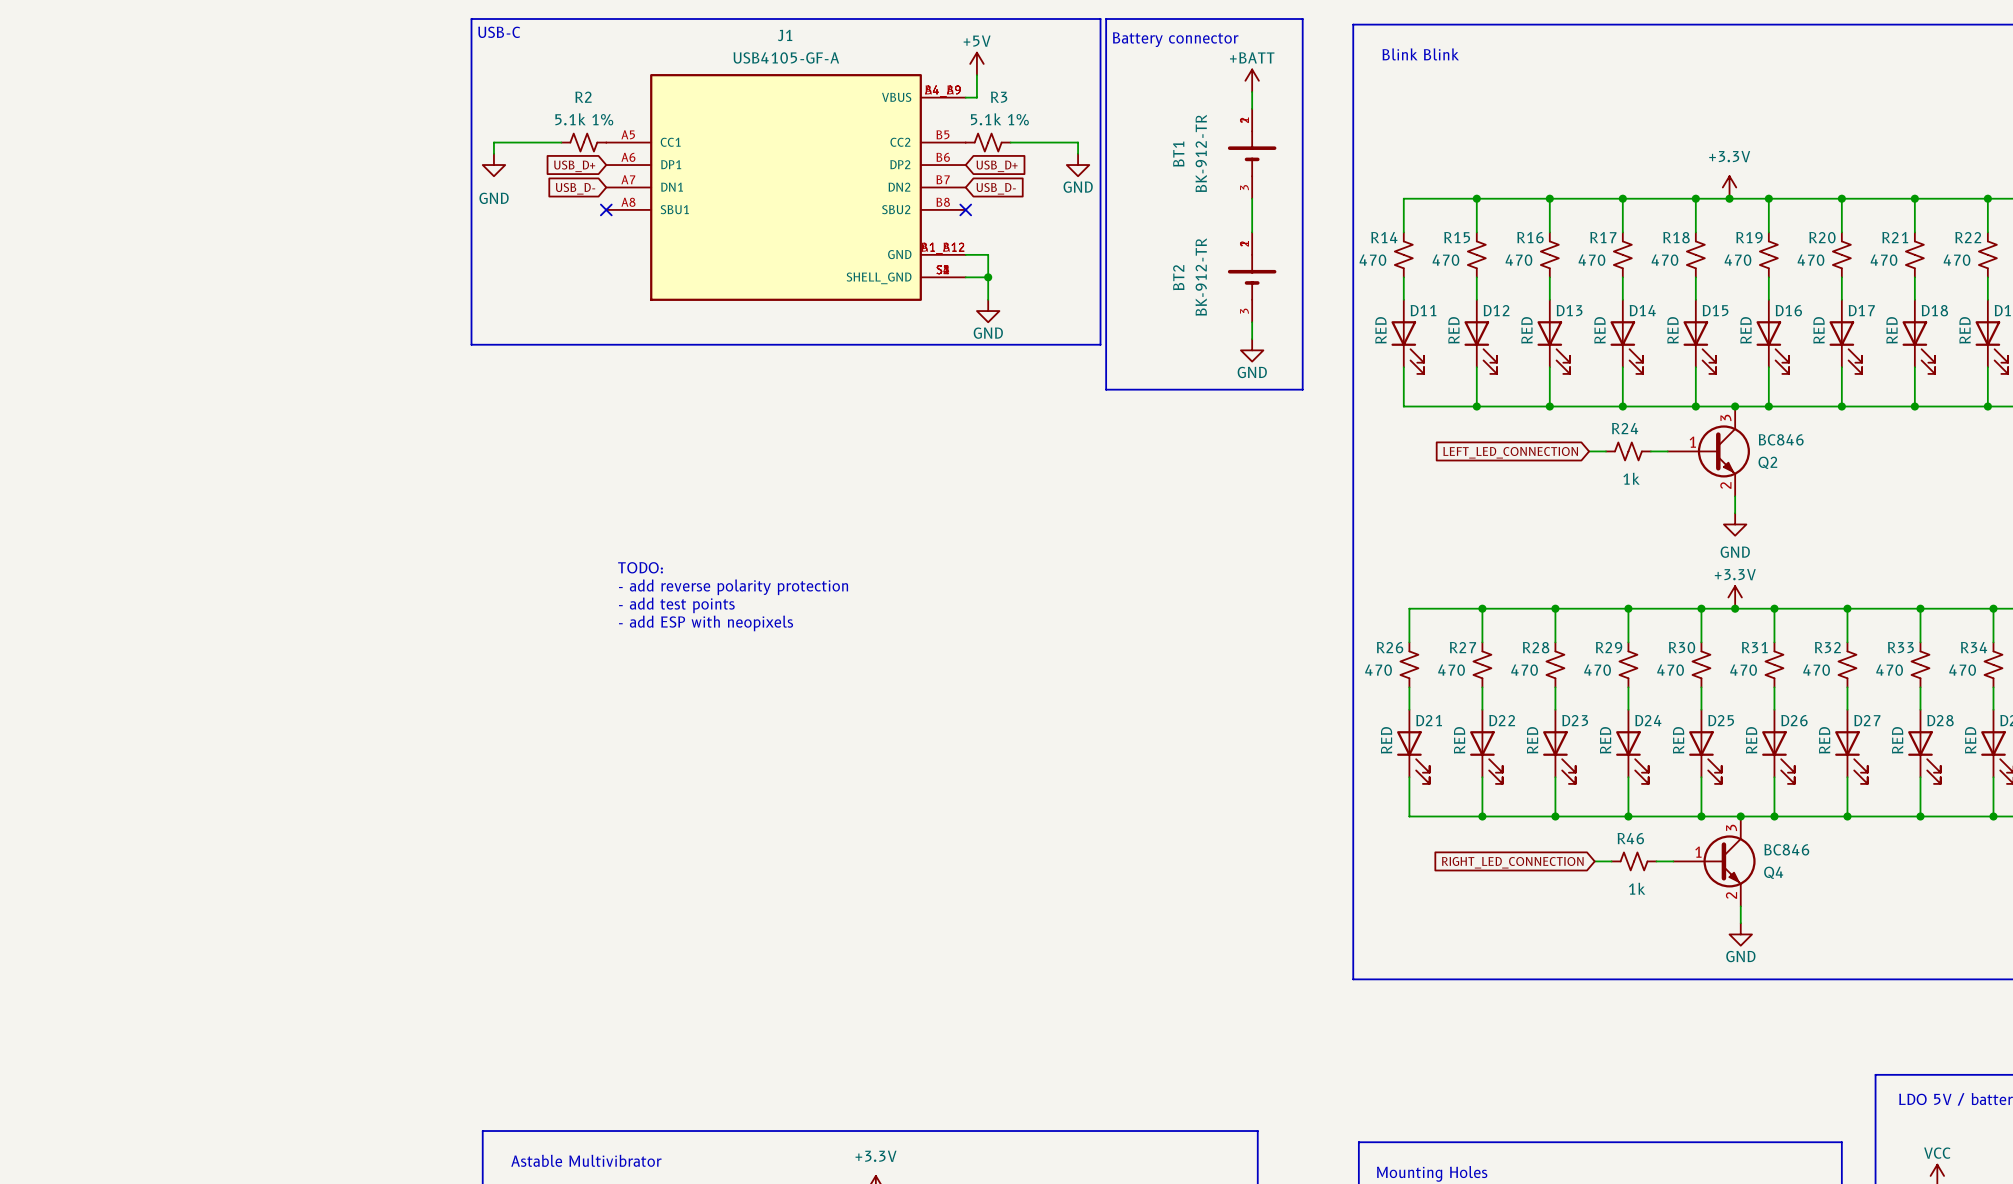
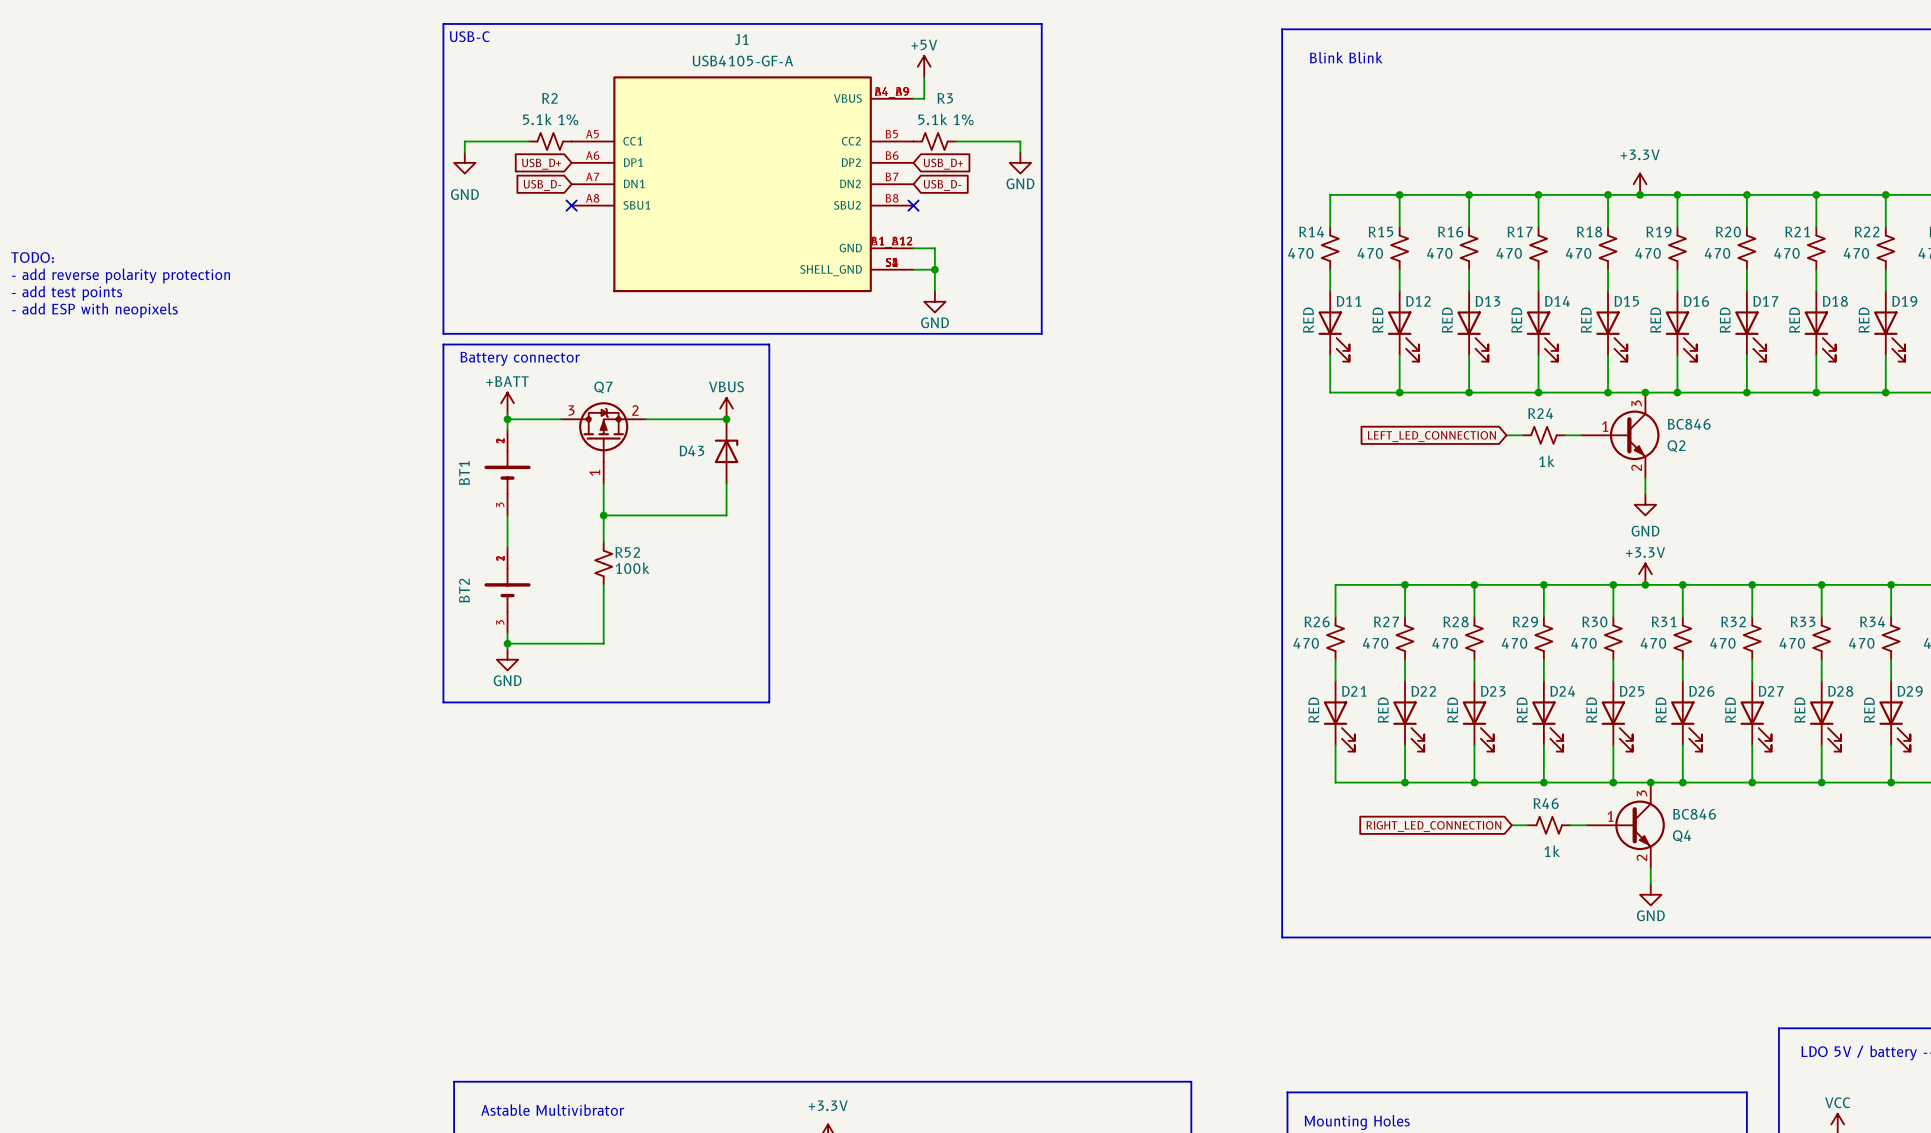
line: (1106, 19) (1106, 389) (1302, 389) (1302, 19) (1106, 19) -> none
text: Battery connector (1175, 39) -> none
power symbol: +BATT (1252, 80) -> none
wire: (1252, 92) (1252, 108) -> none
BT1 value: BK-912-TR (1201, 153) -> none
BT1 position: (1252, 153) -> (507, 472)
BT1 name position: BT1 (1178, 154) -> BT1 (464, 473)
wire: (1252, 198) (1252, 232) -> none
text: none -> TODO: (32, 257)
BT2 name position: BT2 (1178, 277) -> BT2 (464, 590)
BT2 value: BK-912-TR (1201, 277) -> none
BT2 position: (1252, 277) -> (507, 590)
text: none -> - add reverse polarity protection (121, 276)
text: none -> - add test points (67, 293)
text: none -> - add ESP with neopixels (94, 310)
wire: (1252, 322) (1252, 339) -> none
power symbol: GND (1252, 350) -> none
line: none -> (443, 344) (769, 344) (769, 702) (443, 702) (443, 344)
text: none -> Battery connector (520, 358)
power symbol: none -> +BATT (507, 403)
power symbol: none -> VBUS (726, 408)
wire: none -> (507, 413) (507, 429)
wire: none -> (507, 419) (560, 419)
junction: none -> (507, 419)
wire: none -> (646, 419) (726, 419)
junction: none -> (726, 419)
Q7: none -> (603, 442)
D43: none -> (726, 451)
wire: none -> (603, 483) (603, 542)
wire: none -> (726, 483) (726, 515) (603, 515)
wire: none -> (507, 515) (507, 547)
junction: none -> (603, 515)
text: TODO: (640, 567) -> none
R52: none -> 100k (603, 563)
text: - add reverse polarity protection (733, 587) -> none
text: - add test points (676, 605) -> none
wire: none -> (603, 584) (603, 643) (507, 643)
text: - add ESP with neopixels (706, 623) -> none
wire: none -> (507, 632) (507, 649)
junction: none -> (507, 643)
power symbol: none -> GND (507, 659)

